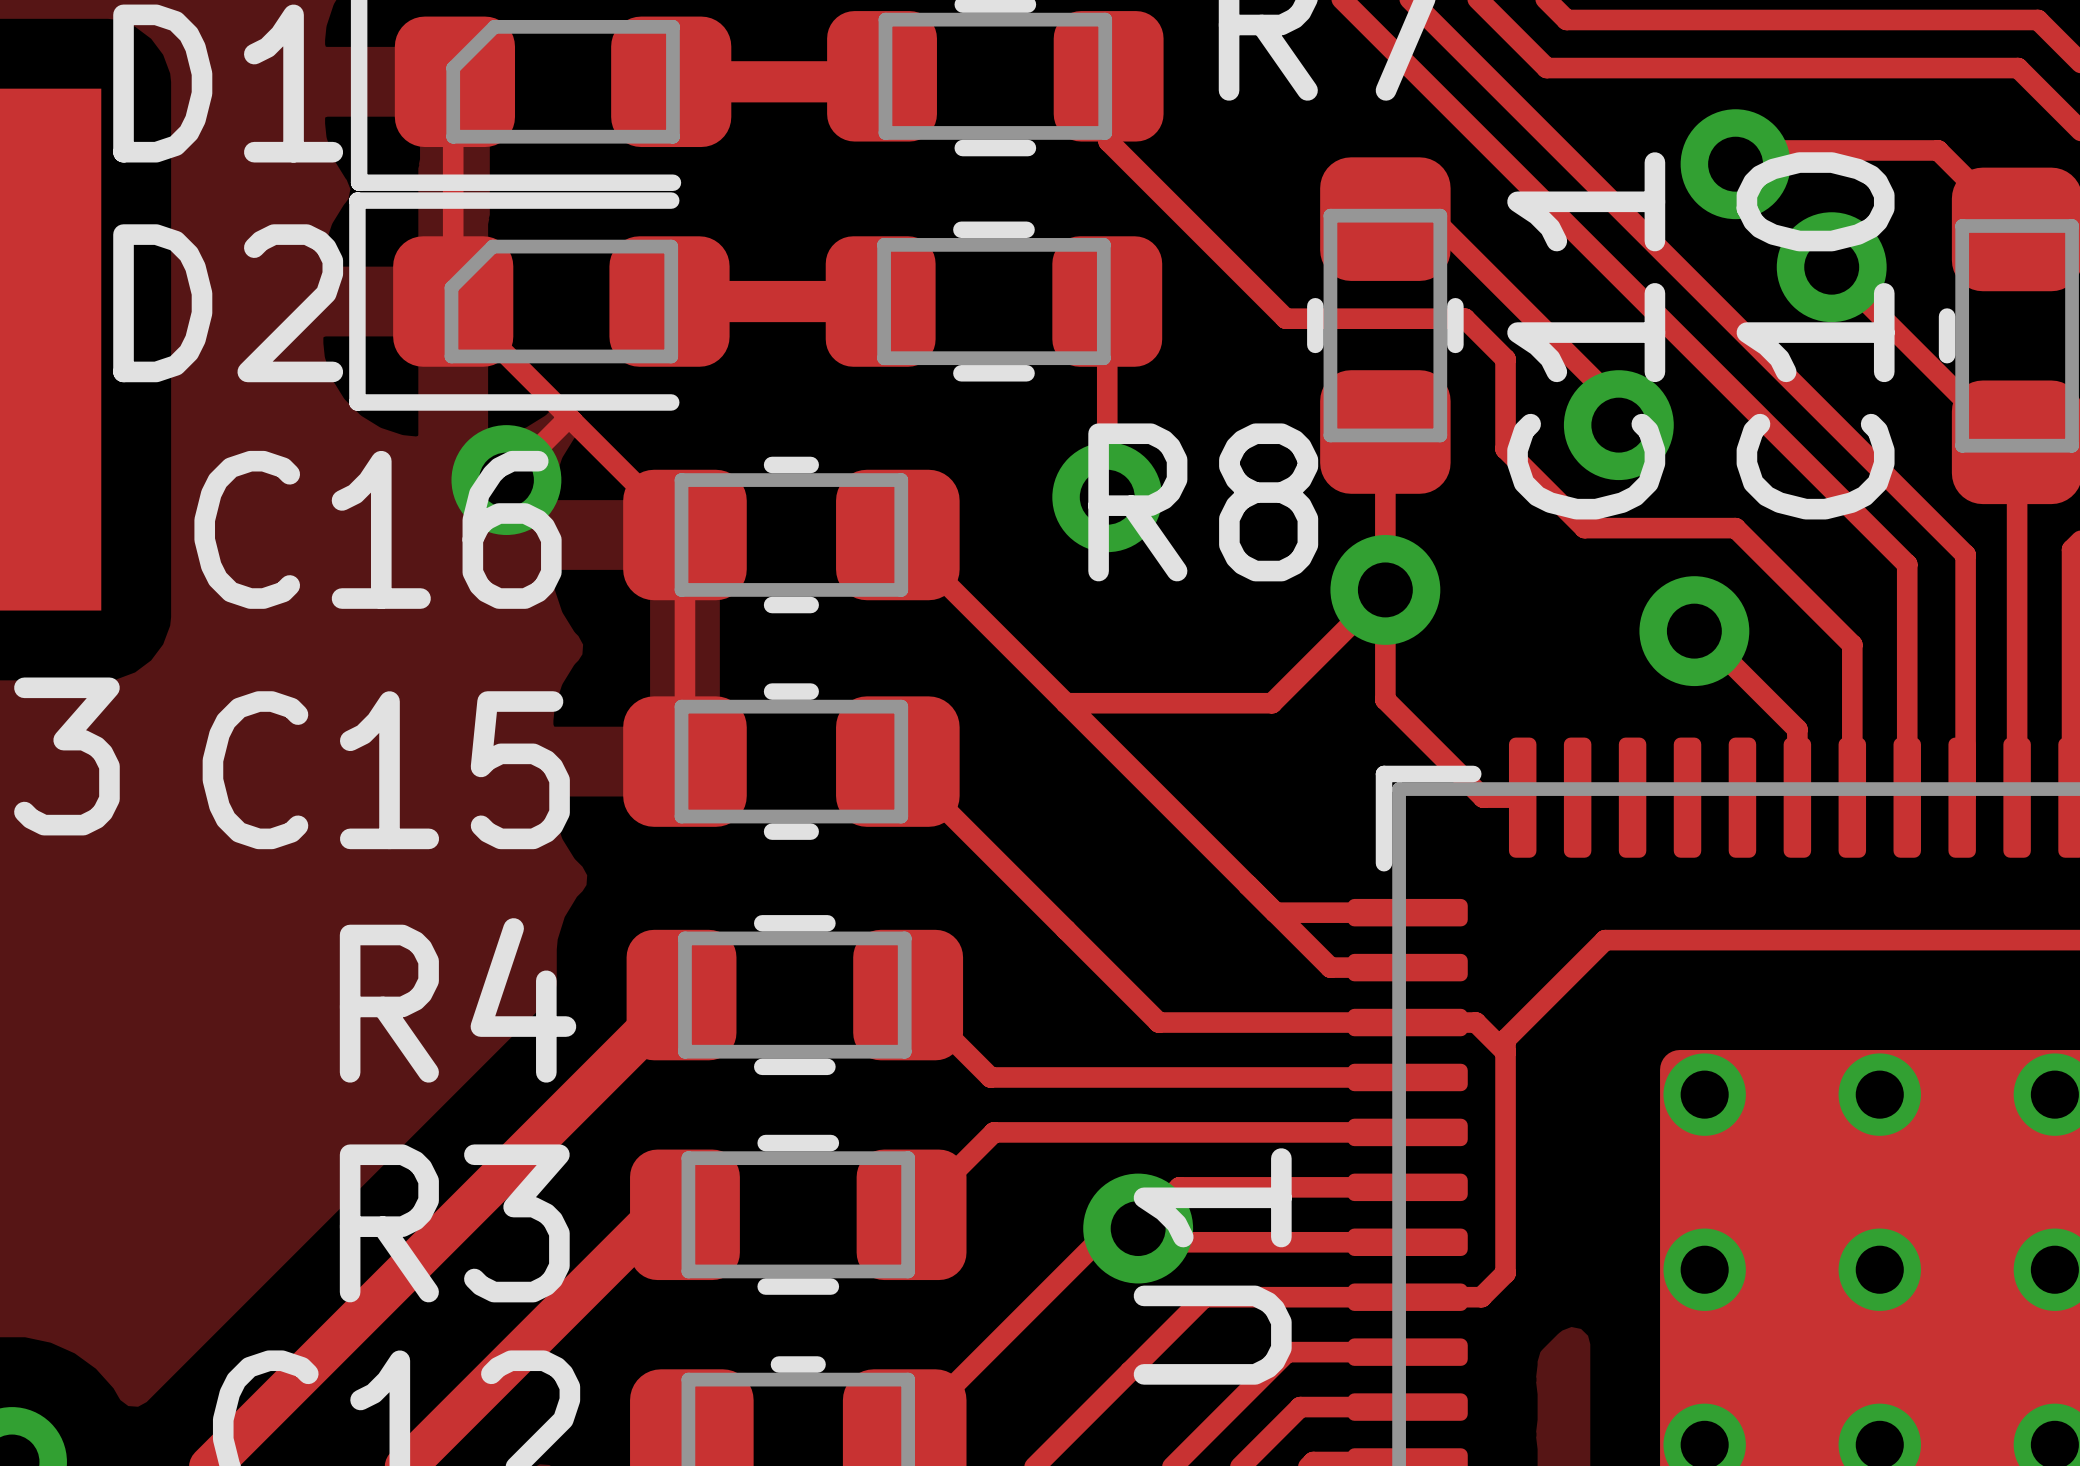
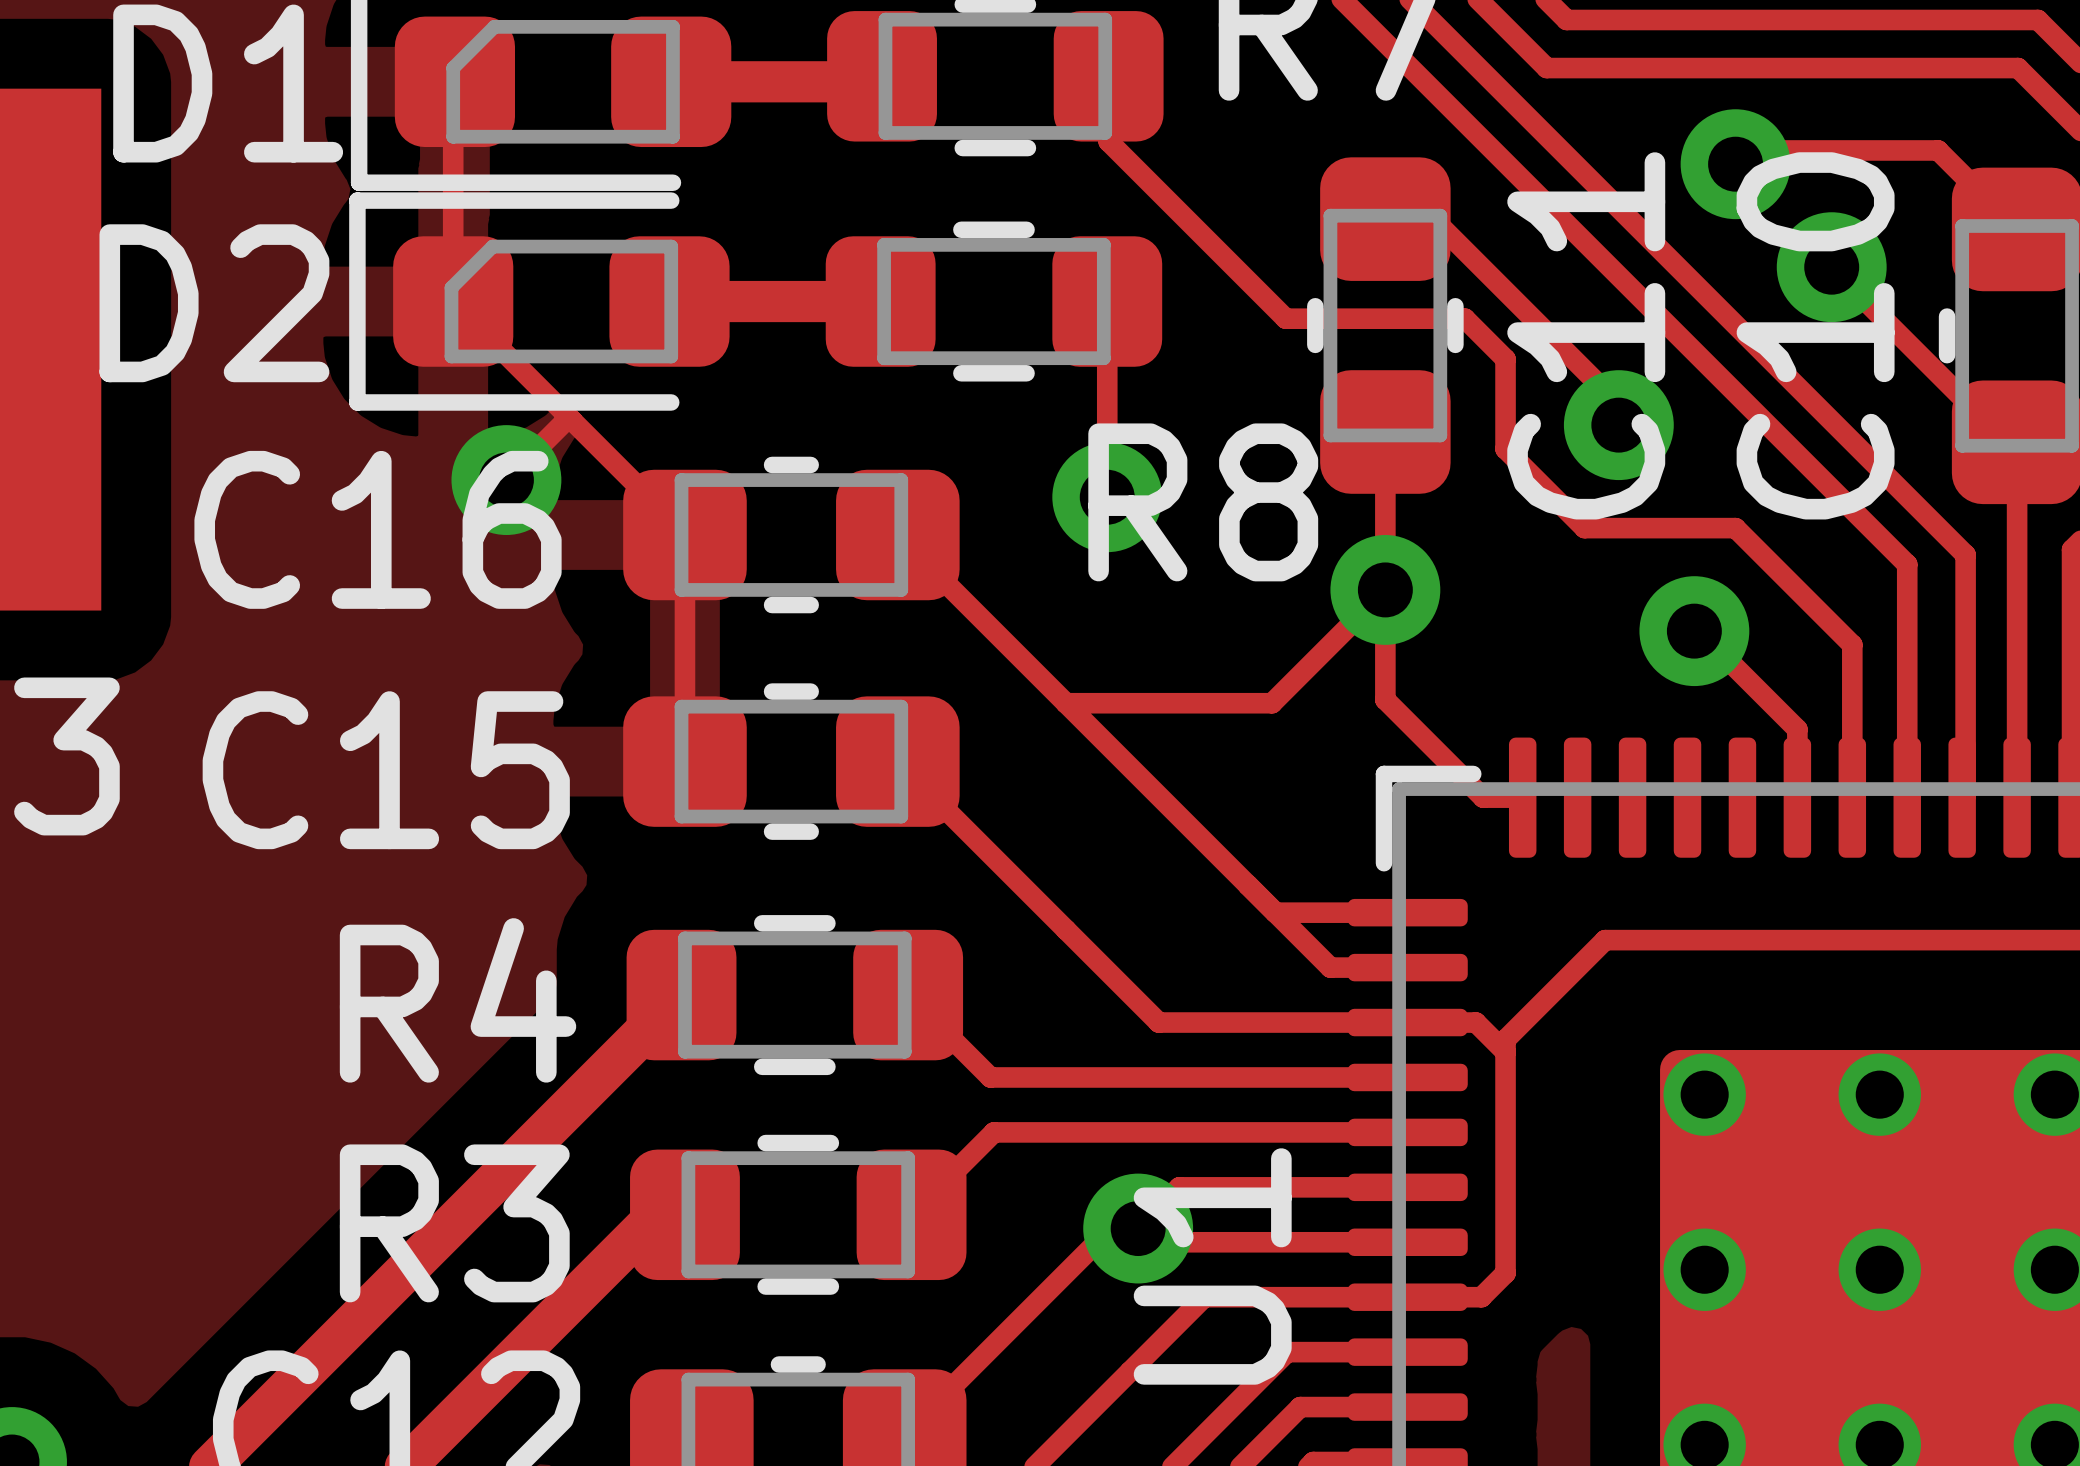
D2 name position: D2 (228, 303) -> D2 (214, 303)

